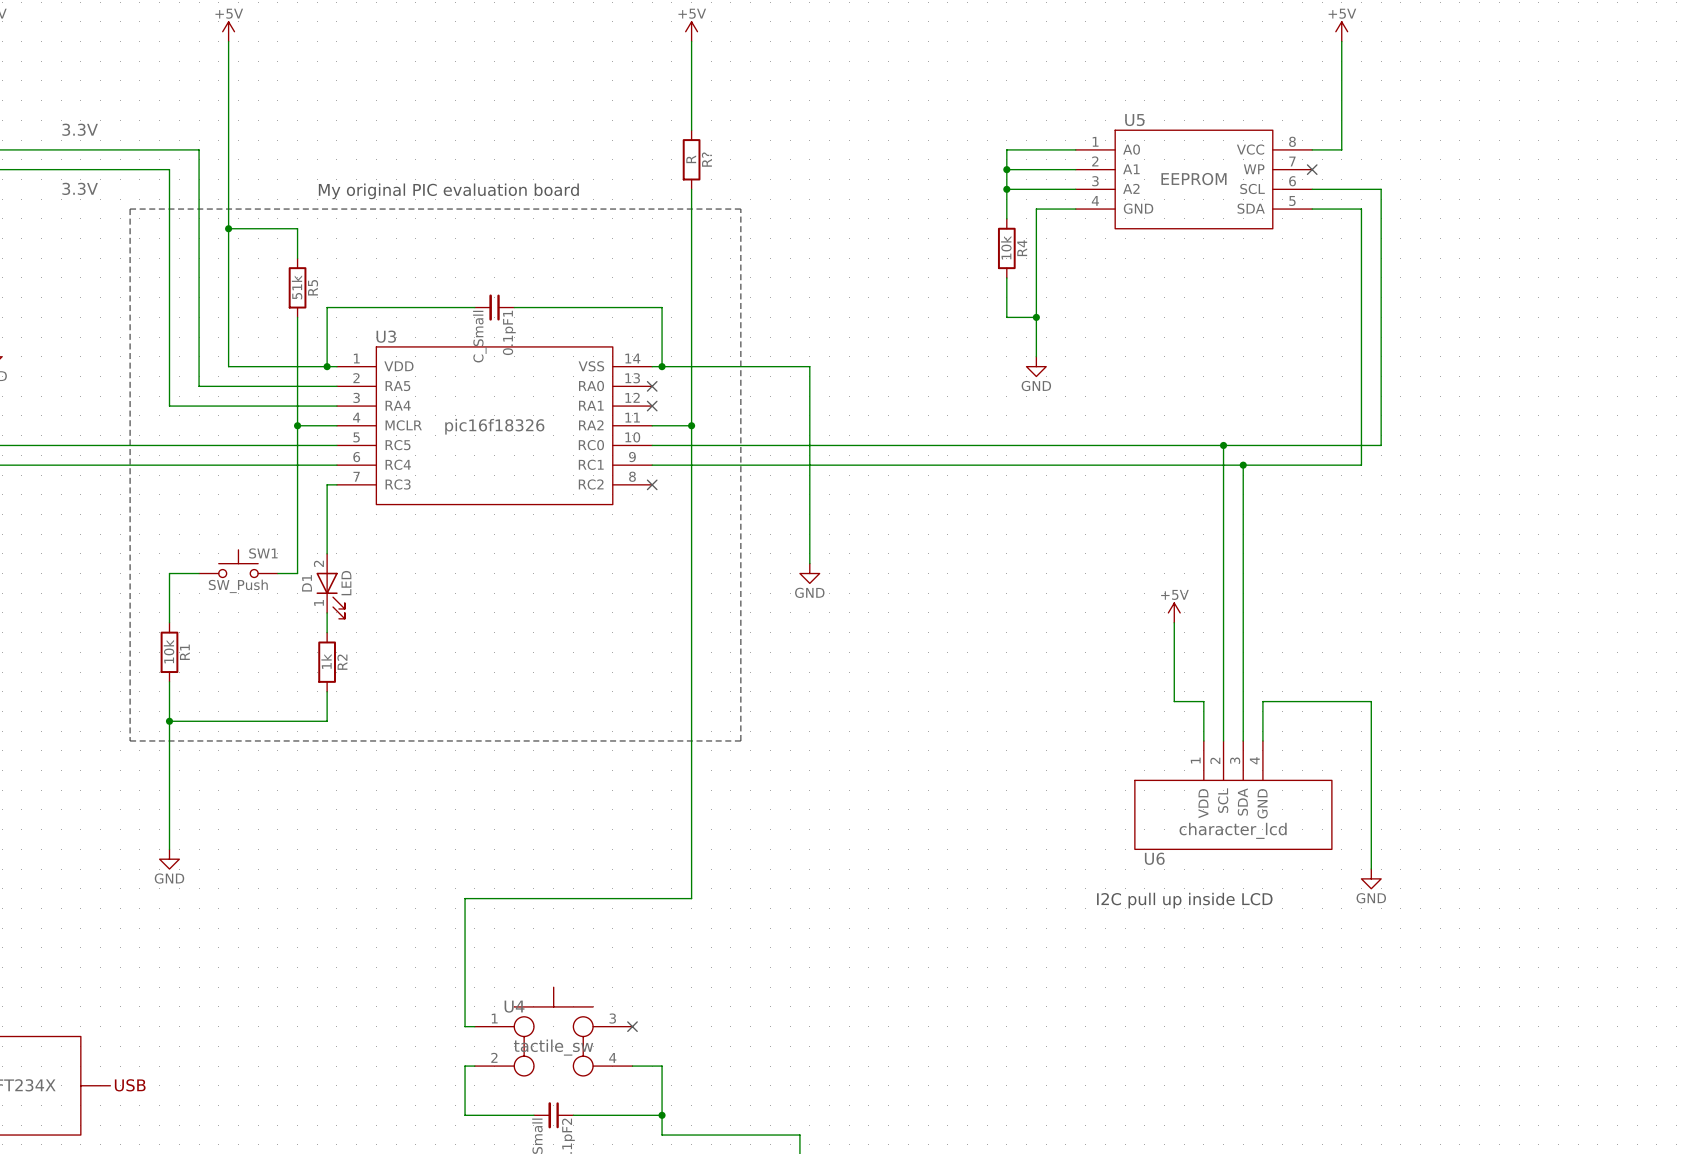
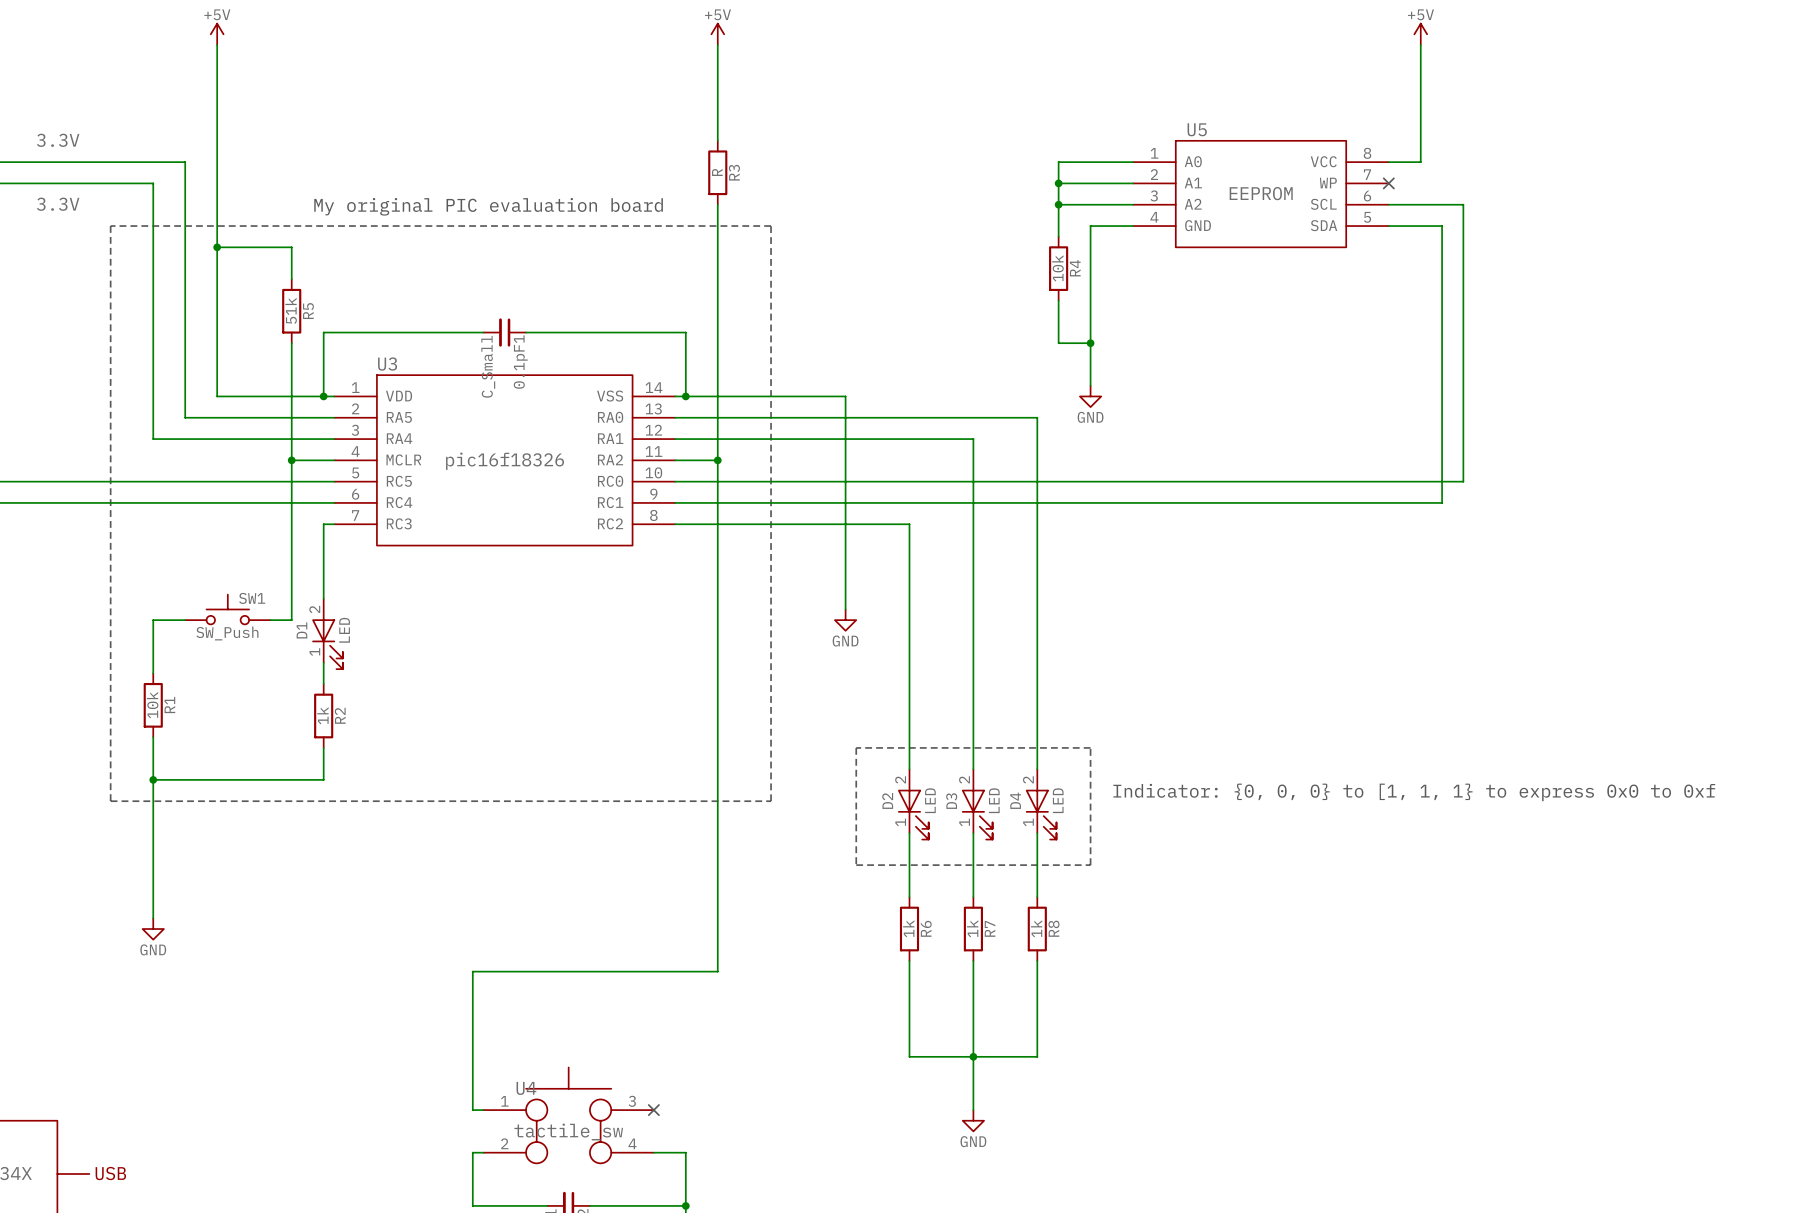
R? name: R? (706, 159) -> R3 (734, 172)
wire: none -> (675, 417) (1037, 417) (1037, 769)
no-connect mark: (652, 386) -> none
wire: none -> (675, 439) (973, 439) (973, 769)
no-connect mark: (652, 406) -> none
wire: (1223, 445) (1223, 740) -> none
junction: (1223, 445) -> none
wire: (1243, 465) (1243, 740) -> none
junction: (1243, 465) -> none
wire: none -> (675, 524) (909, 524) (909, 769)
no-connect mark: (652, 484) -> none
power symbol: +5V (1174, 612) -> none
wire: (1174, 622) (1174, 701) (1203, 701) (1203, 740) -> none
line: none -> (856, 747) (856, 865) (1090, 865) (1090, 747) (856, 747)
text: none -> Indicator: {0, 0, 0} to [1, 1, 1} to express 0x0 to 0xf (1414, 792)
wire: (1262, 740) (1262, 701) (1371, 701) (1371, 869) -> none
D2: none -> LED (913, 804)
D3: none -> LED (977, 804)
D4: none -> LED (1041, 804)
wire: none -> (909, 833) (909, 897)
wire: none -> (973, 833) (973, 897)
wire: none -> (1037, 833) (1037, 897)
U6: character_lcd (1233, 795) -> none
R6: none -> 1k (909, 929)
R7: none -> 1k (973, 929)
R8: none -> 1k (1037, 929)
power symbol: GND (1371, 878) -> none
wire: none -> (909, 960) (909, 1056) (1037, 1056) (1037, 960)
wire: none -> (973, 960) (973, 1110)
text: I2C pull up inside LCD (1184, 900) -> none
junction: none -> (973, 1056)
power symbol: none -> GND (973, 1120)

